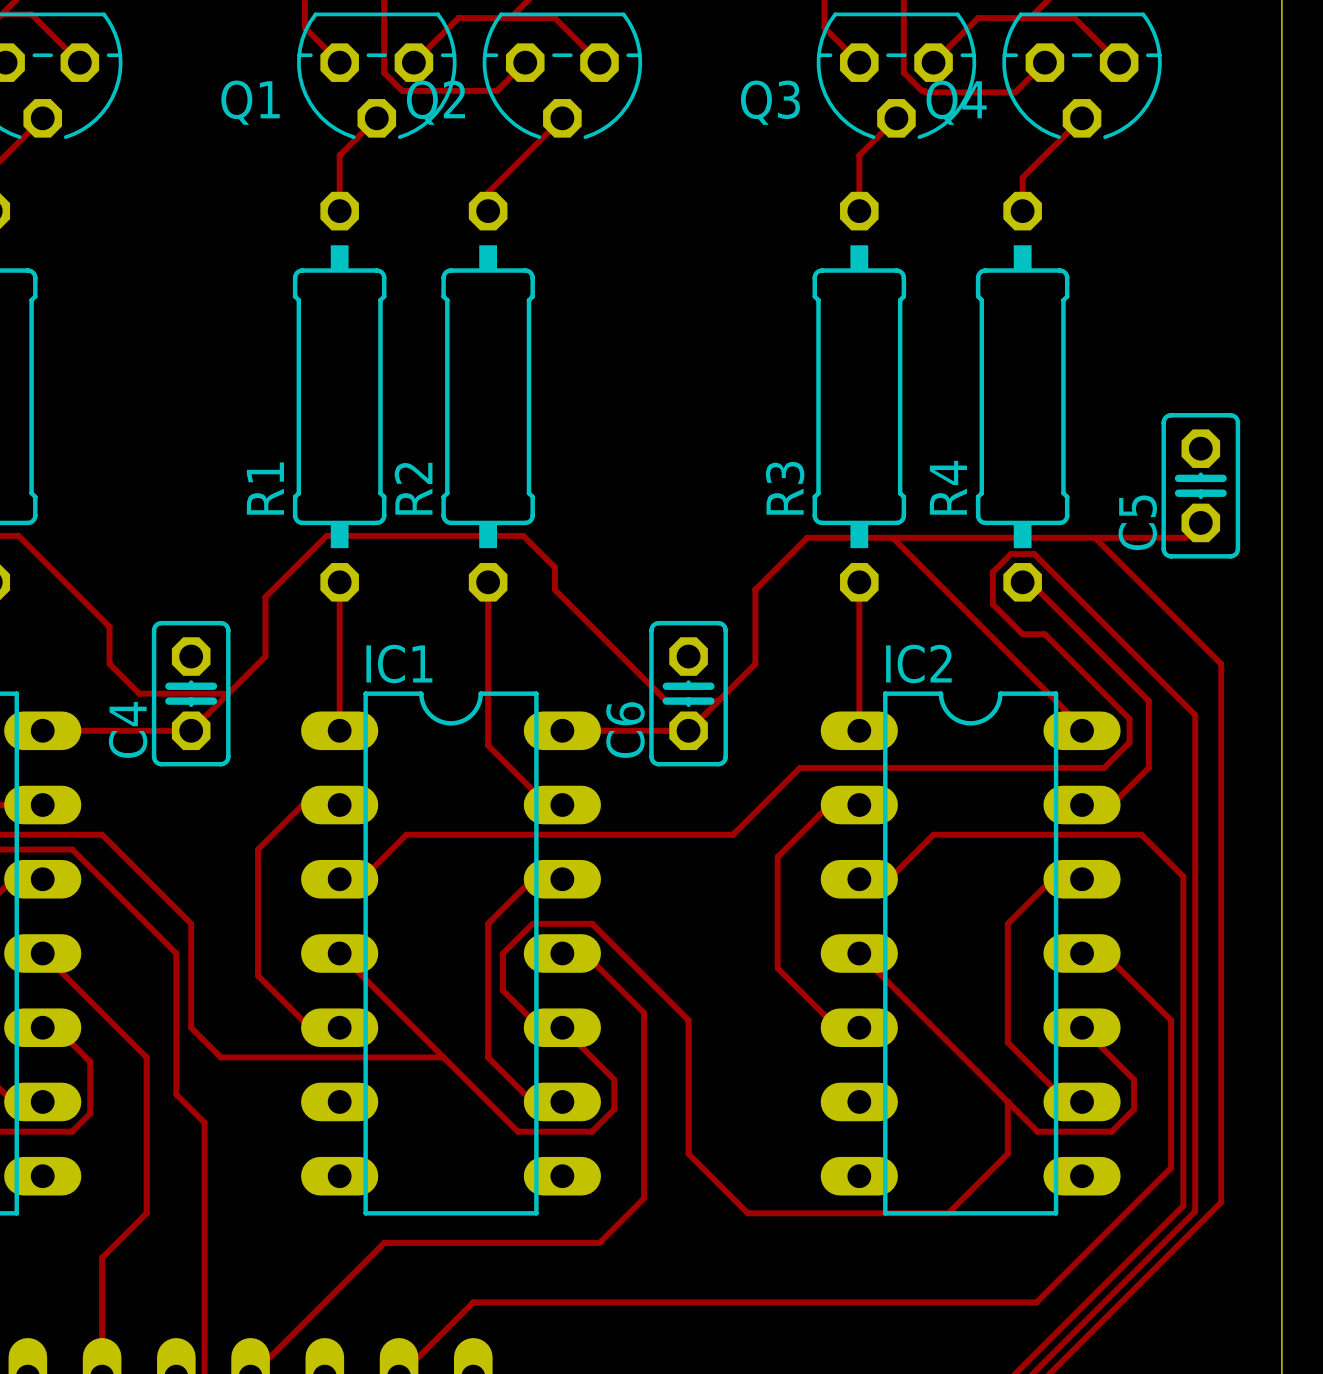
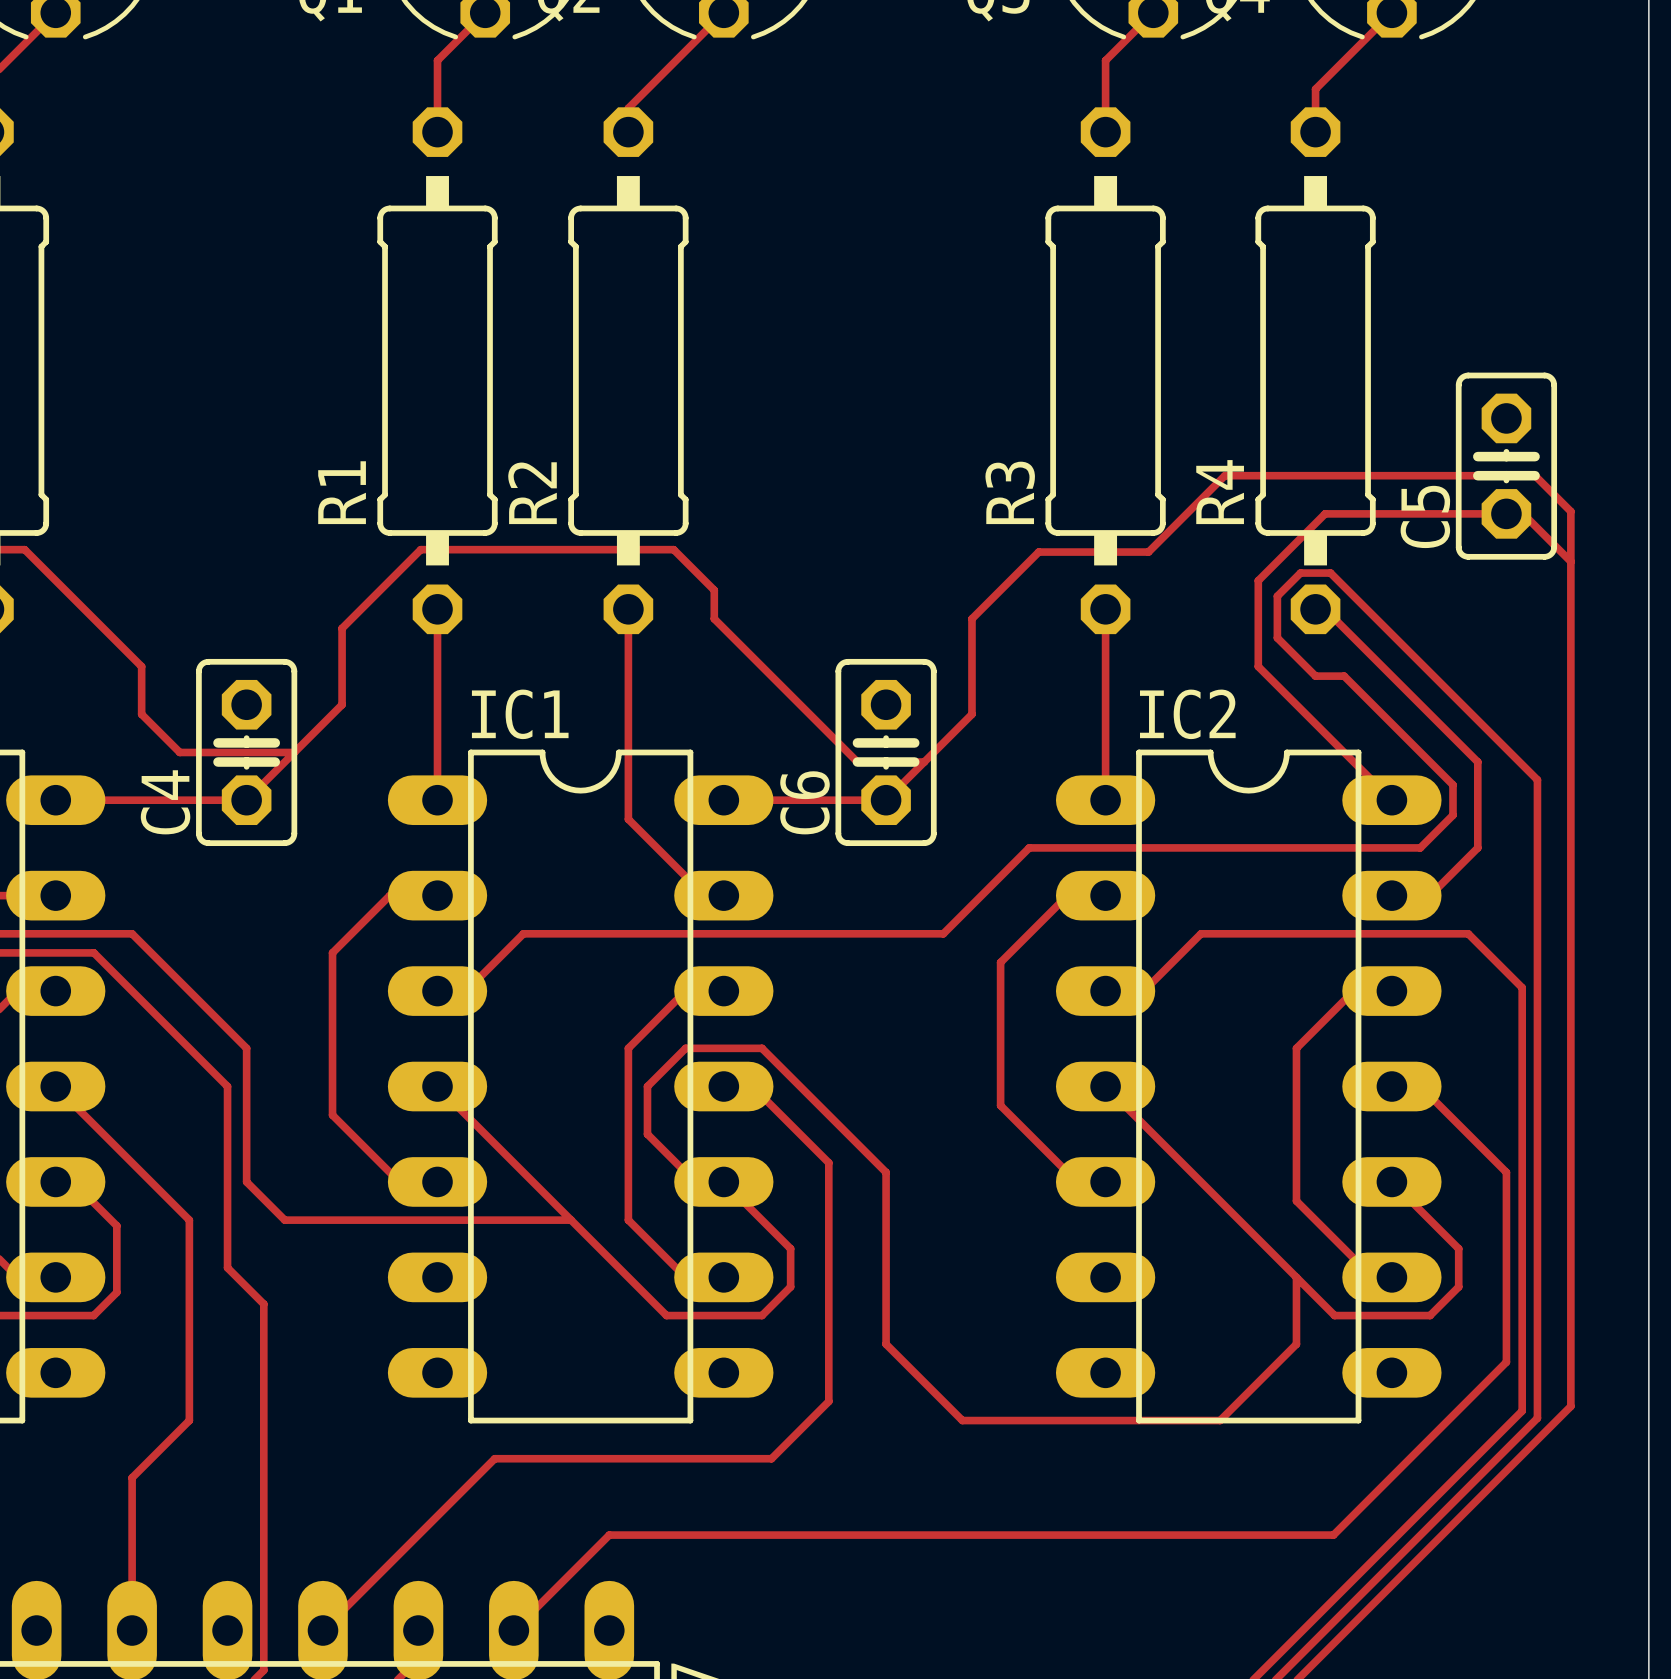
C5 position: (1200, 485) -> (1506, 466)
top track: (1200, 522) (1185, 537) (892, 537) (1082, 727) (1082, 730) -> (1570, 561) (1523, 513) (1325, 513) (1258, 580) (1258, 666) (1391, 800)
top track: (1095, 537) (1221, 663) -> (1148, 552) (1224, 475) (1535, 475) (1570, 511) (1570, 714)

